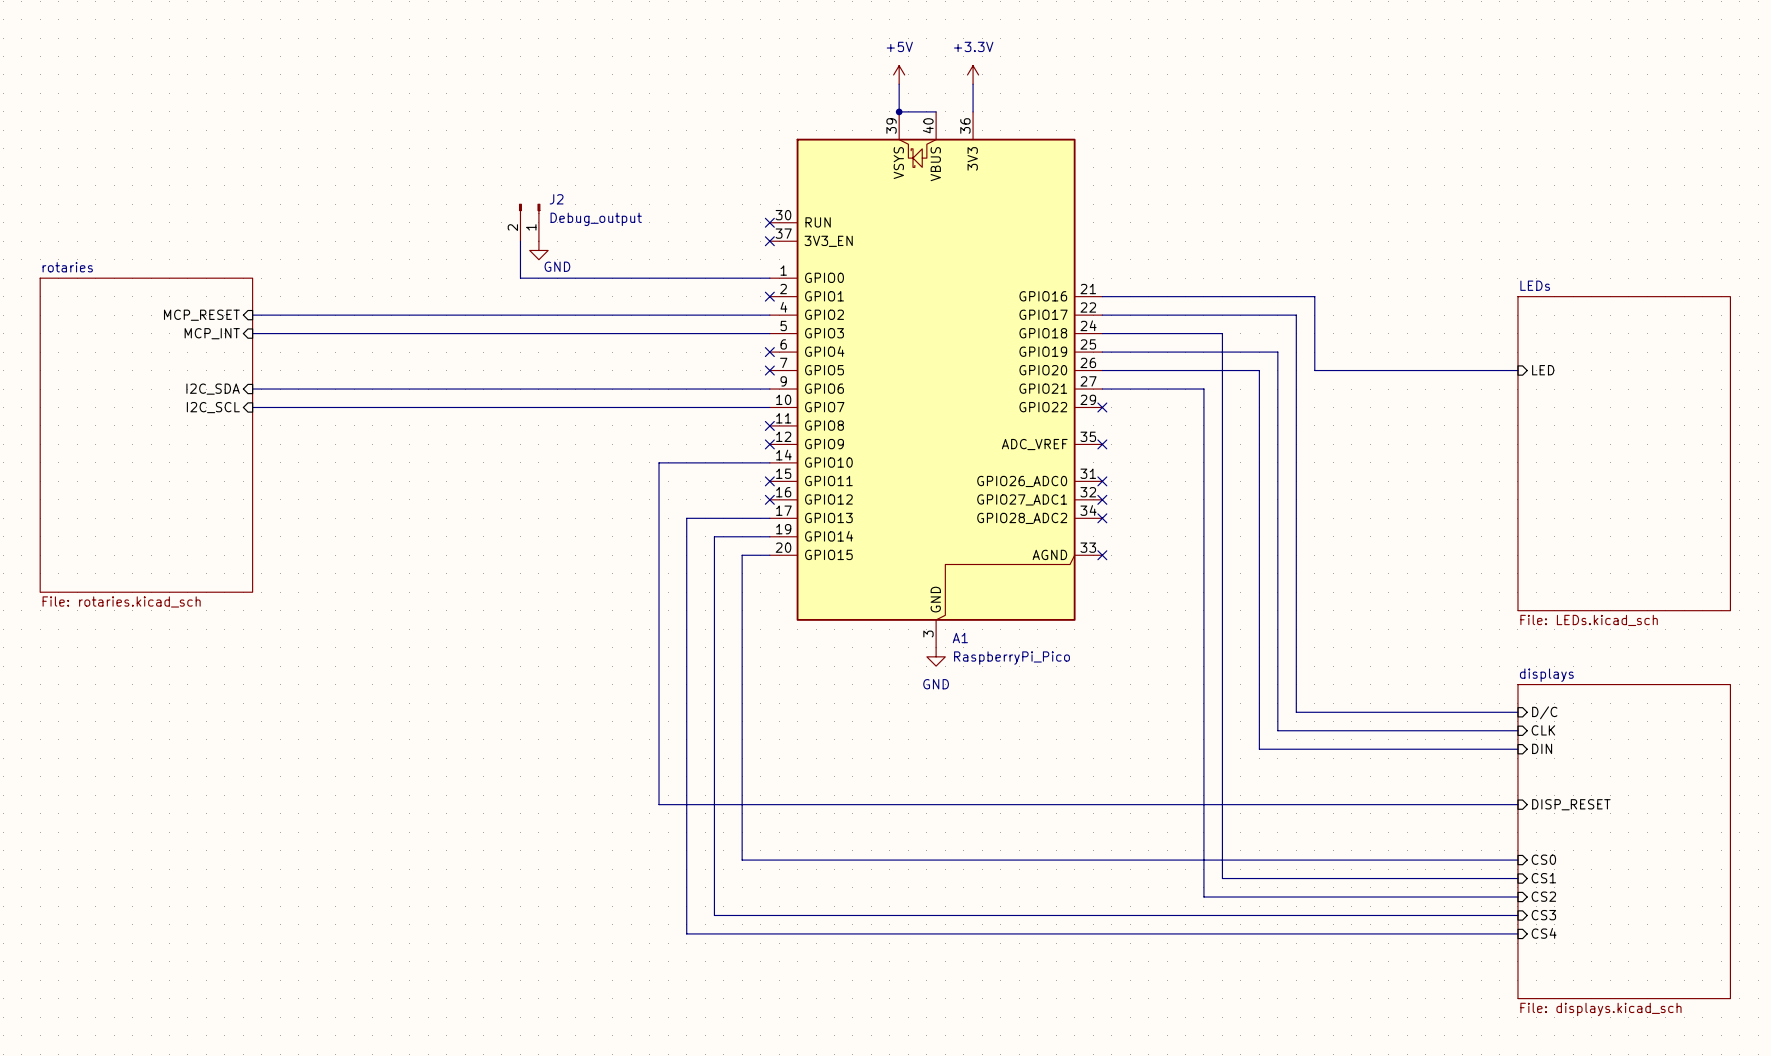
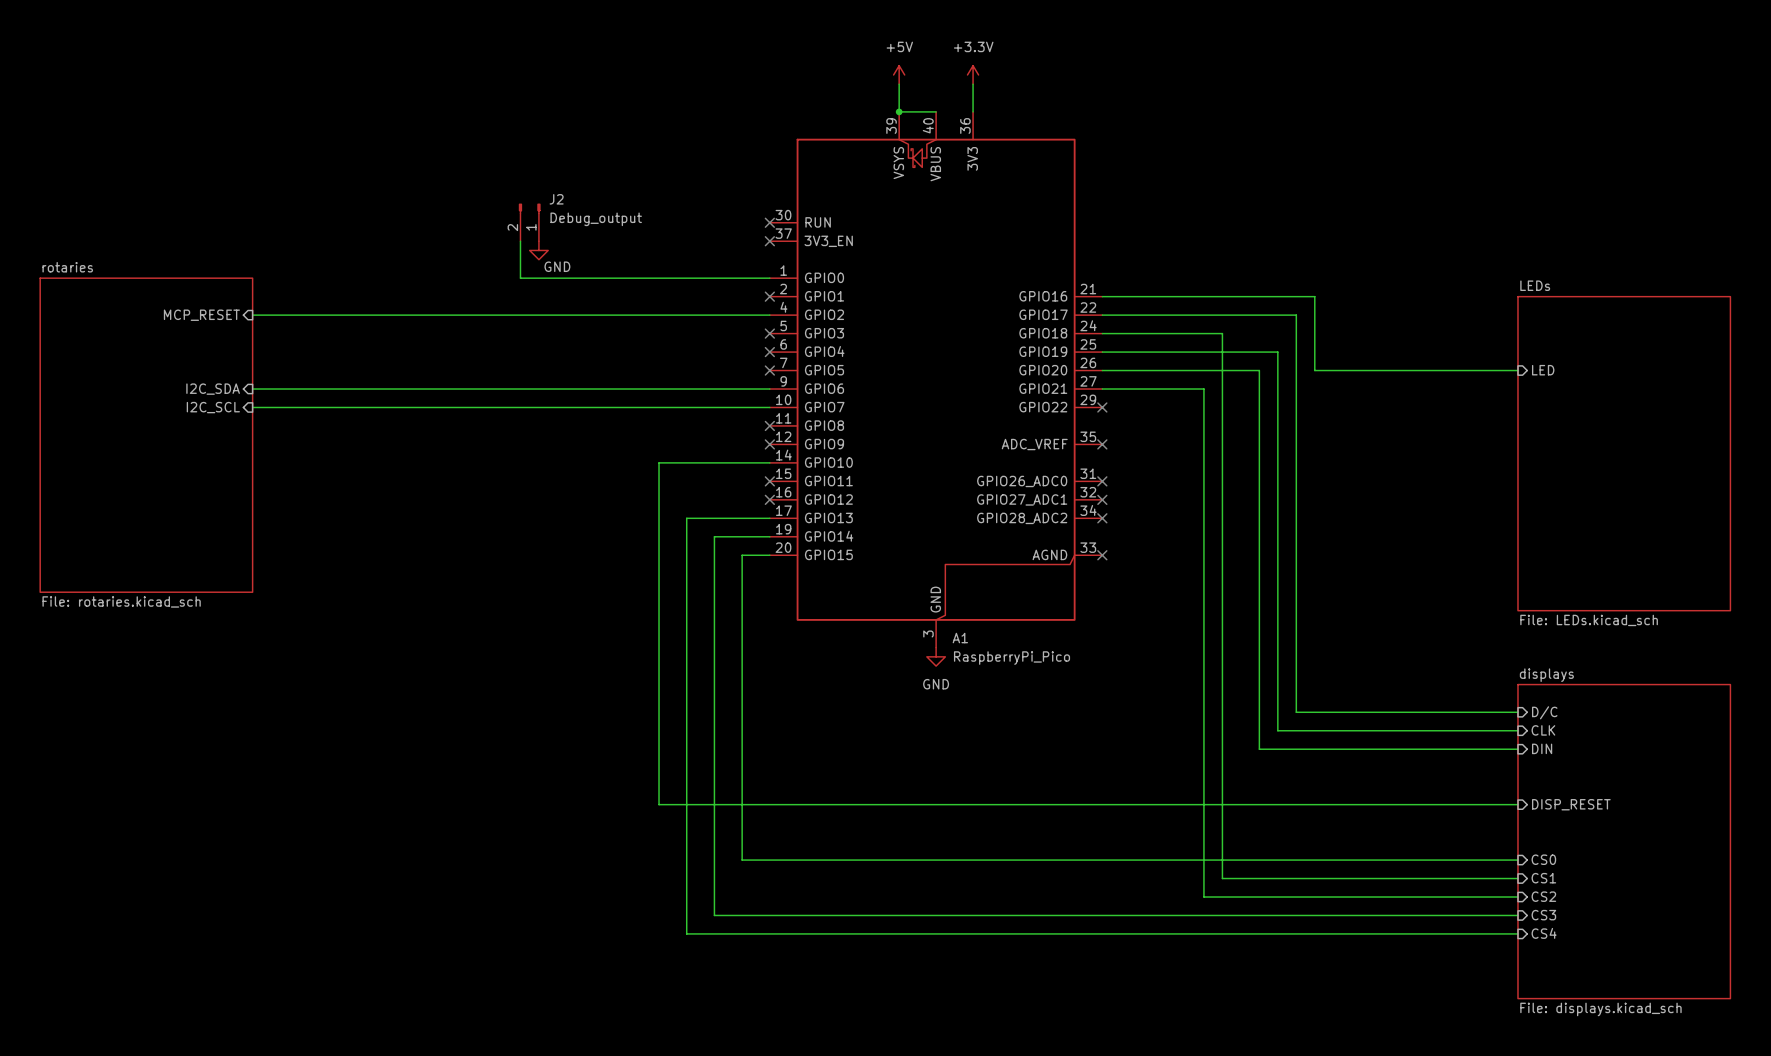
sheet pin: MCP_INT (212, 333) -> none
wire: (252, 333) (769, 333) -> none
no-connect mark: none -> (769, 333)

